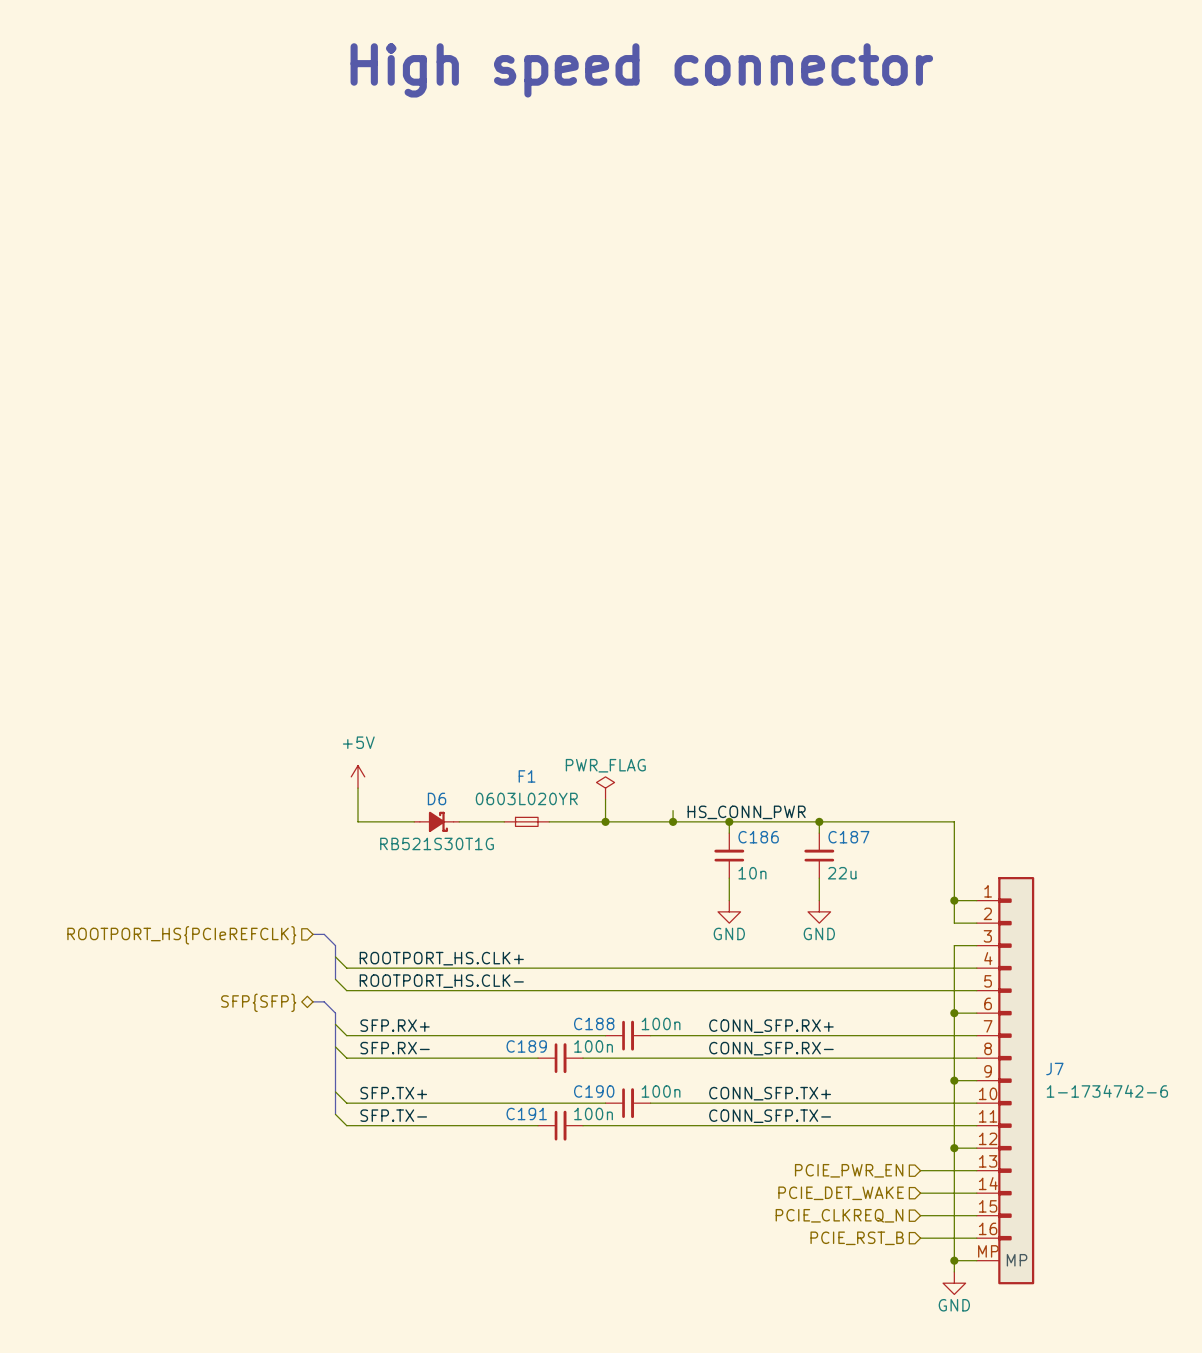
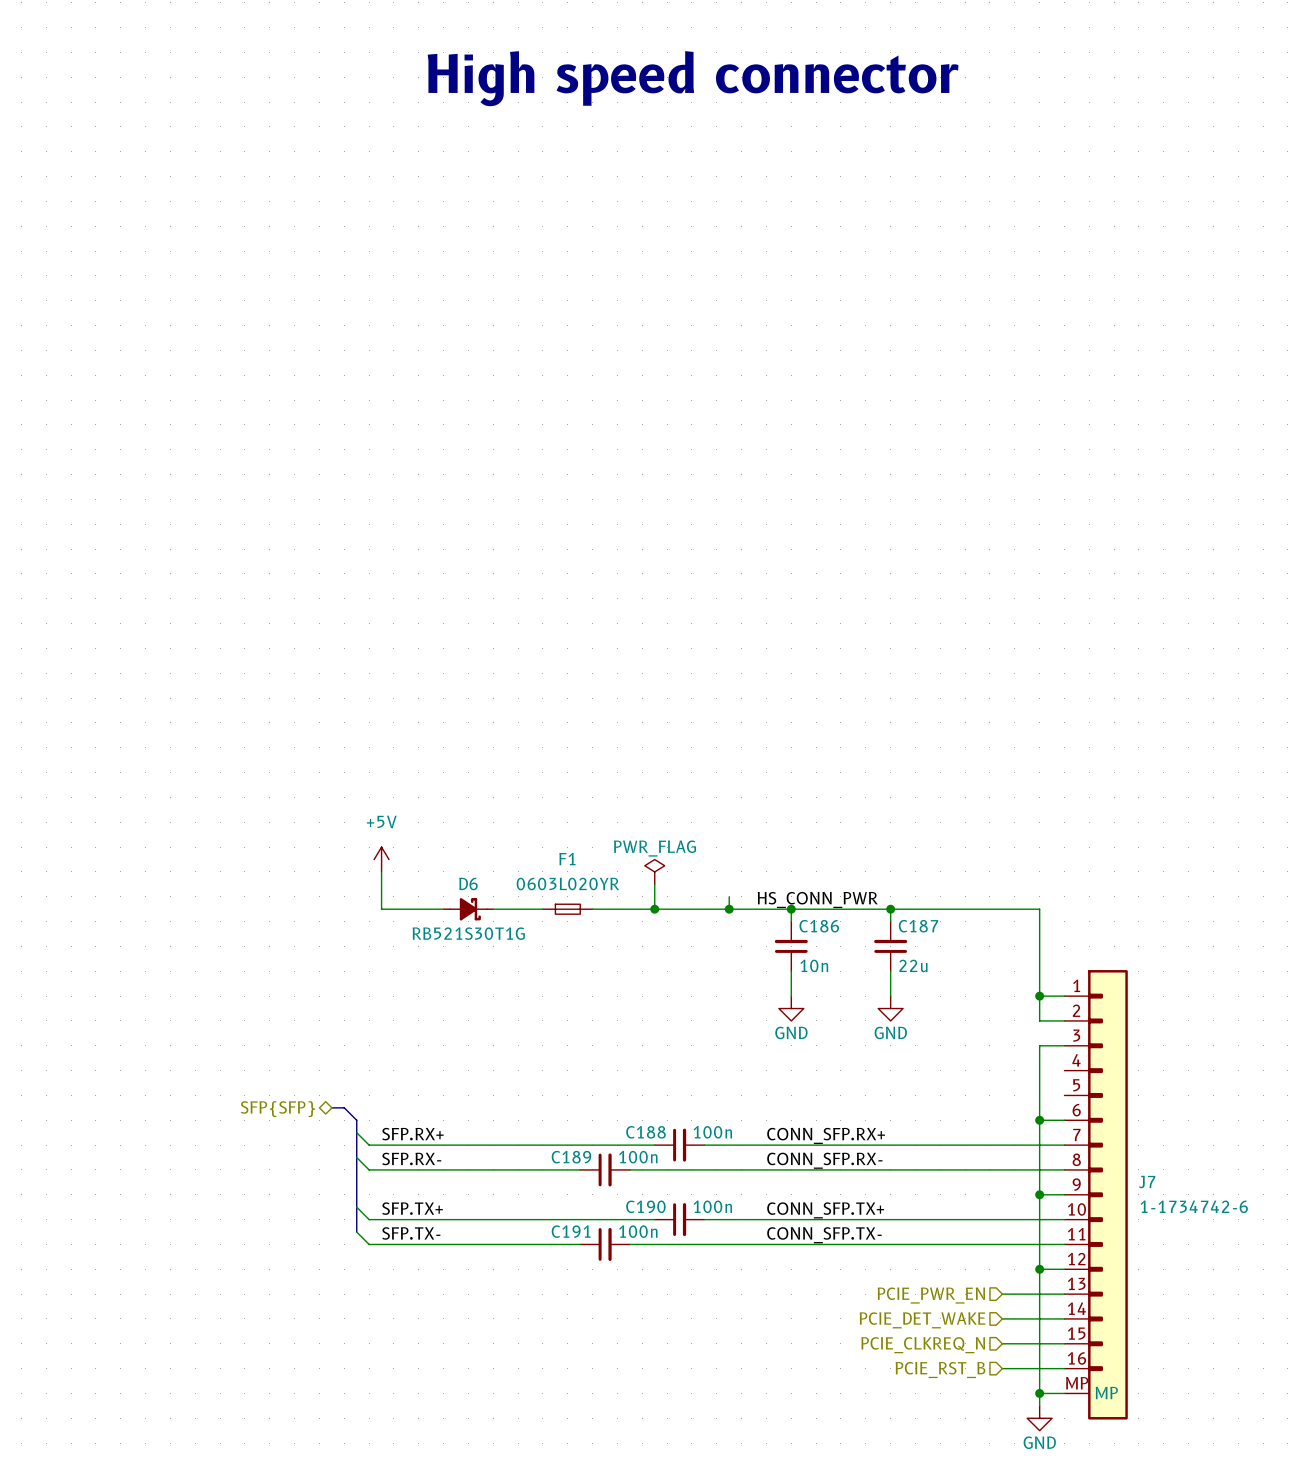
bus: (312, 934) (324, 934) (335, 945) (335, 979) -> none
hierarchical label: ROOTPORT_HS{PCIeREFCLK} (181, 935) -> none
wire: (335, 956) (346, 968) (976, 968) -> none
label: ROOTPORT_HS.CLK+ (441, 958) -> none
wire: (335, 979) (346, 990) (976, 990) -> none
label: ROOTPORT_HS.CLK- (441, 981) -> none

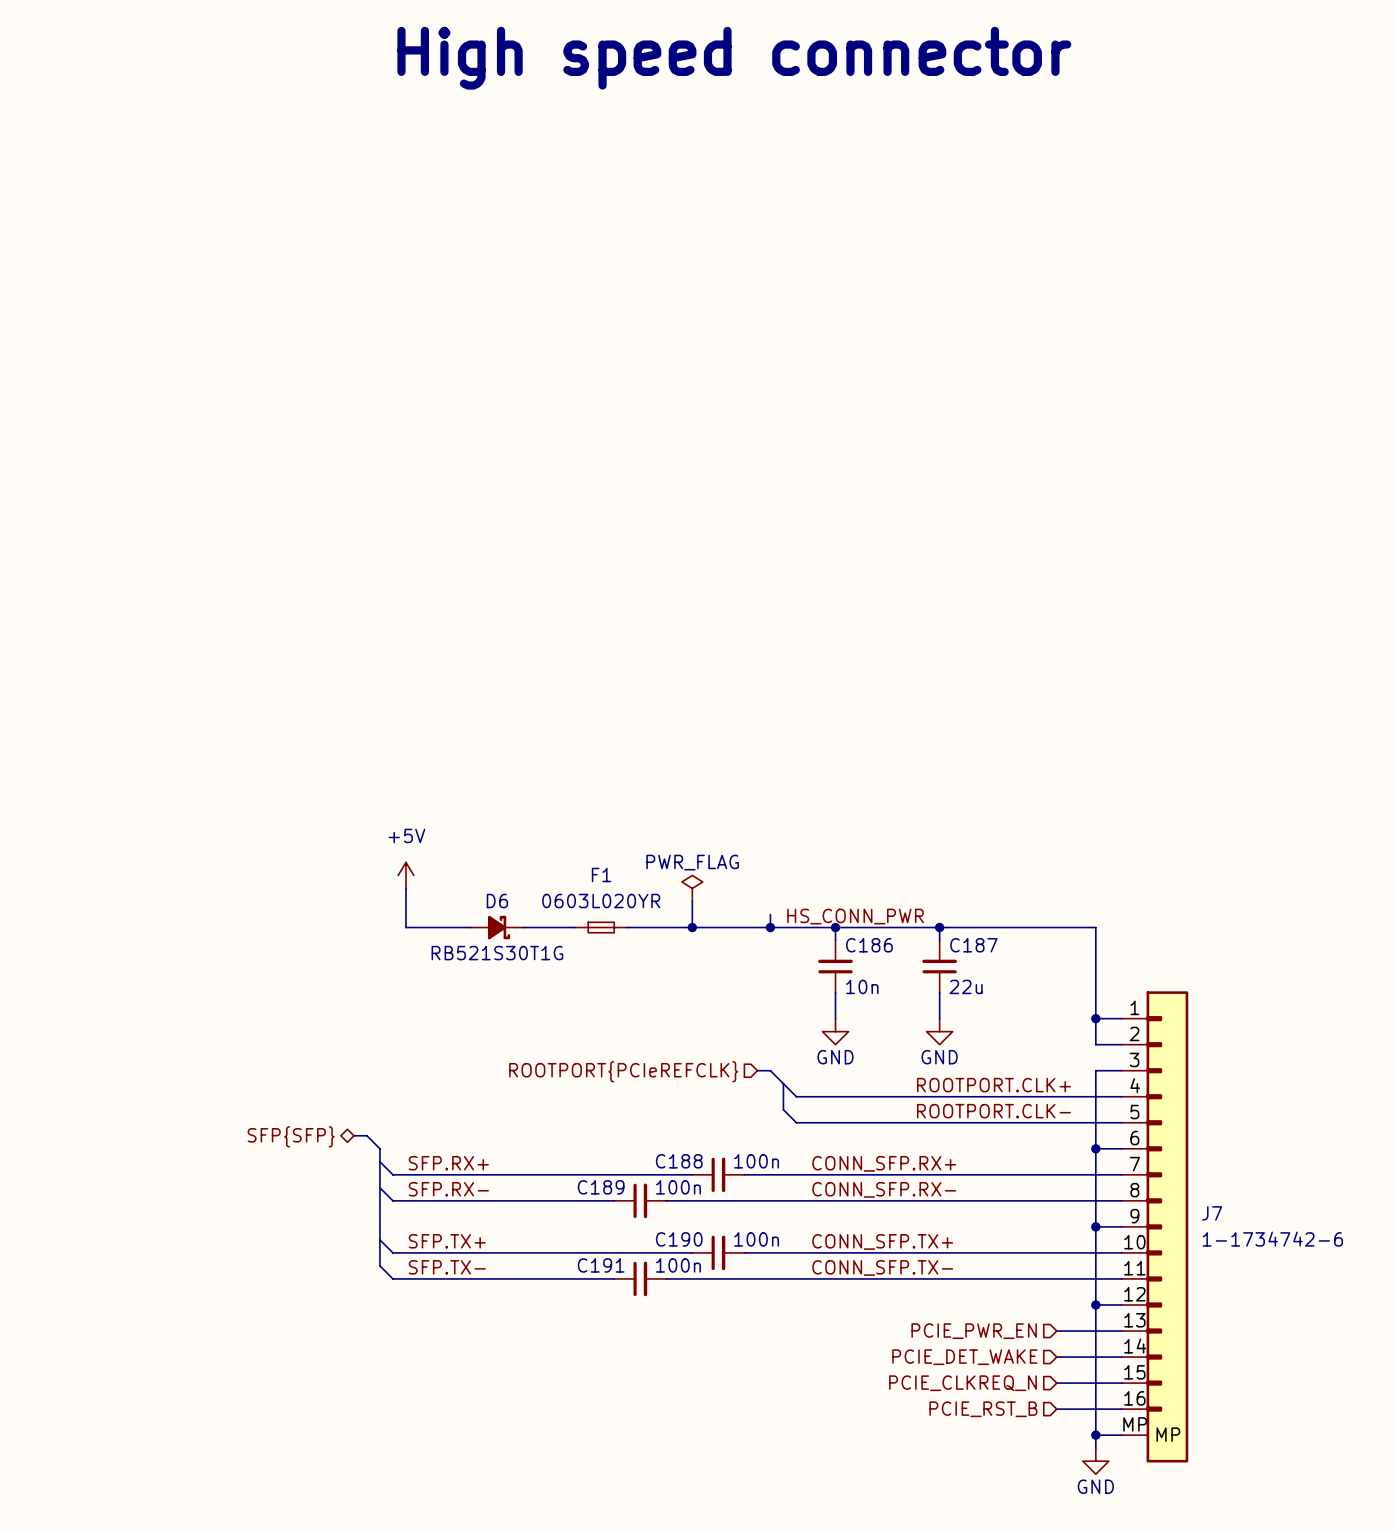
bus: none -> (757, 1070) (770, 1070) (783, 1083) (783, 1109)
hierarchical label: none -> ROOTPORT{PCIeREFCLK} (623, 1071)
wire: none -> (783, 1083) (796, 1096) (1121, 1096)
label: none -> ROOTPORT.CLK+ (993, 1085)
wire: none -> (783, 1109) (796, 1122) (1121, 1122)
label: none -> ROOTPORT.CLK- (993, 1111)

